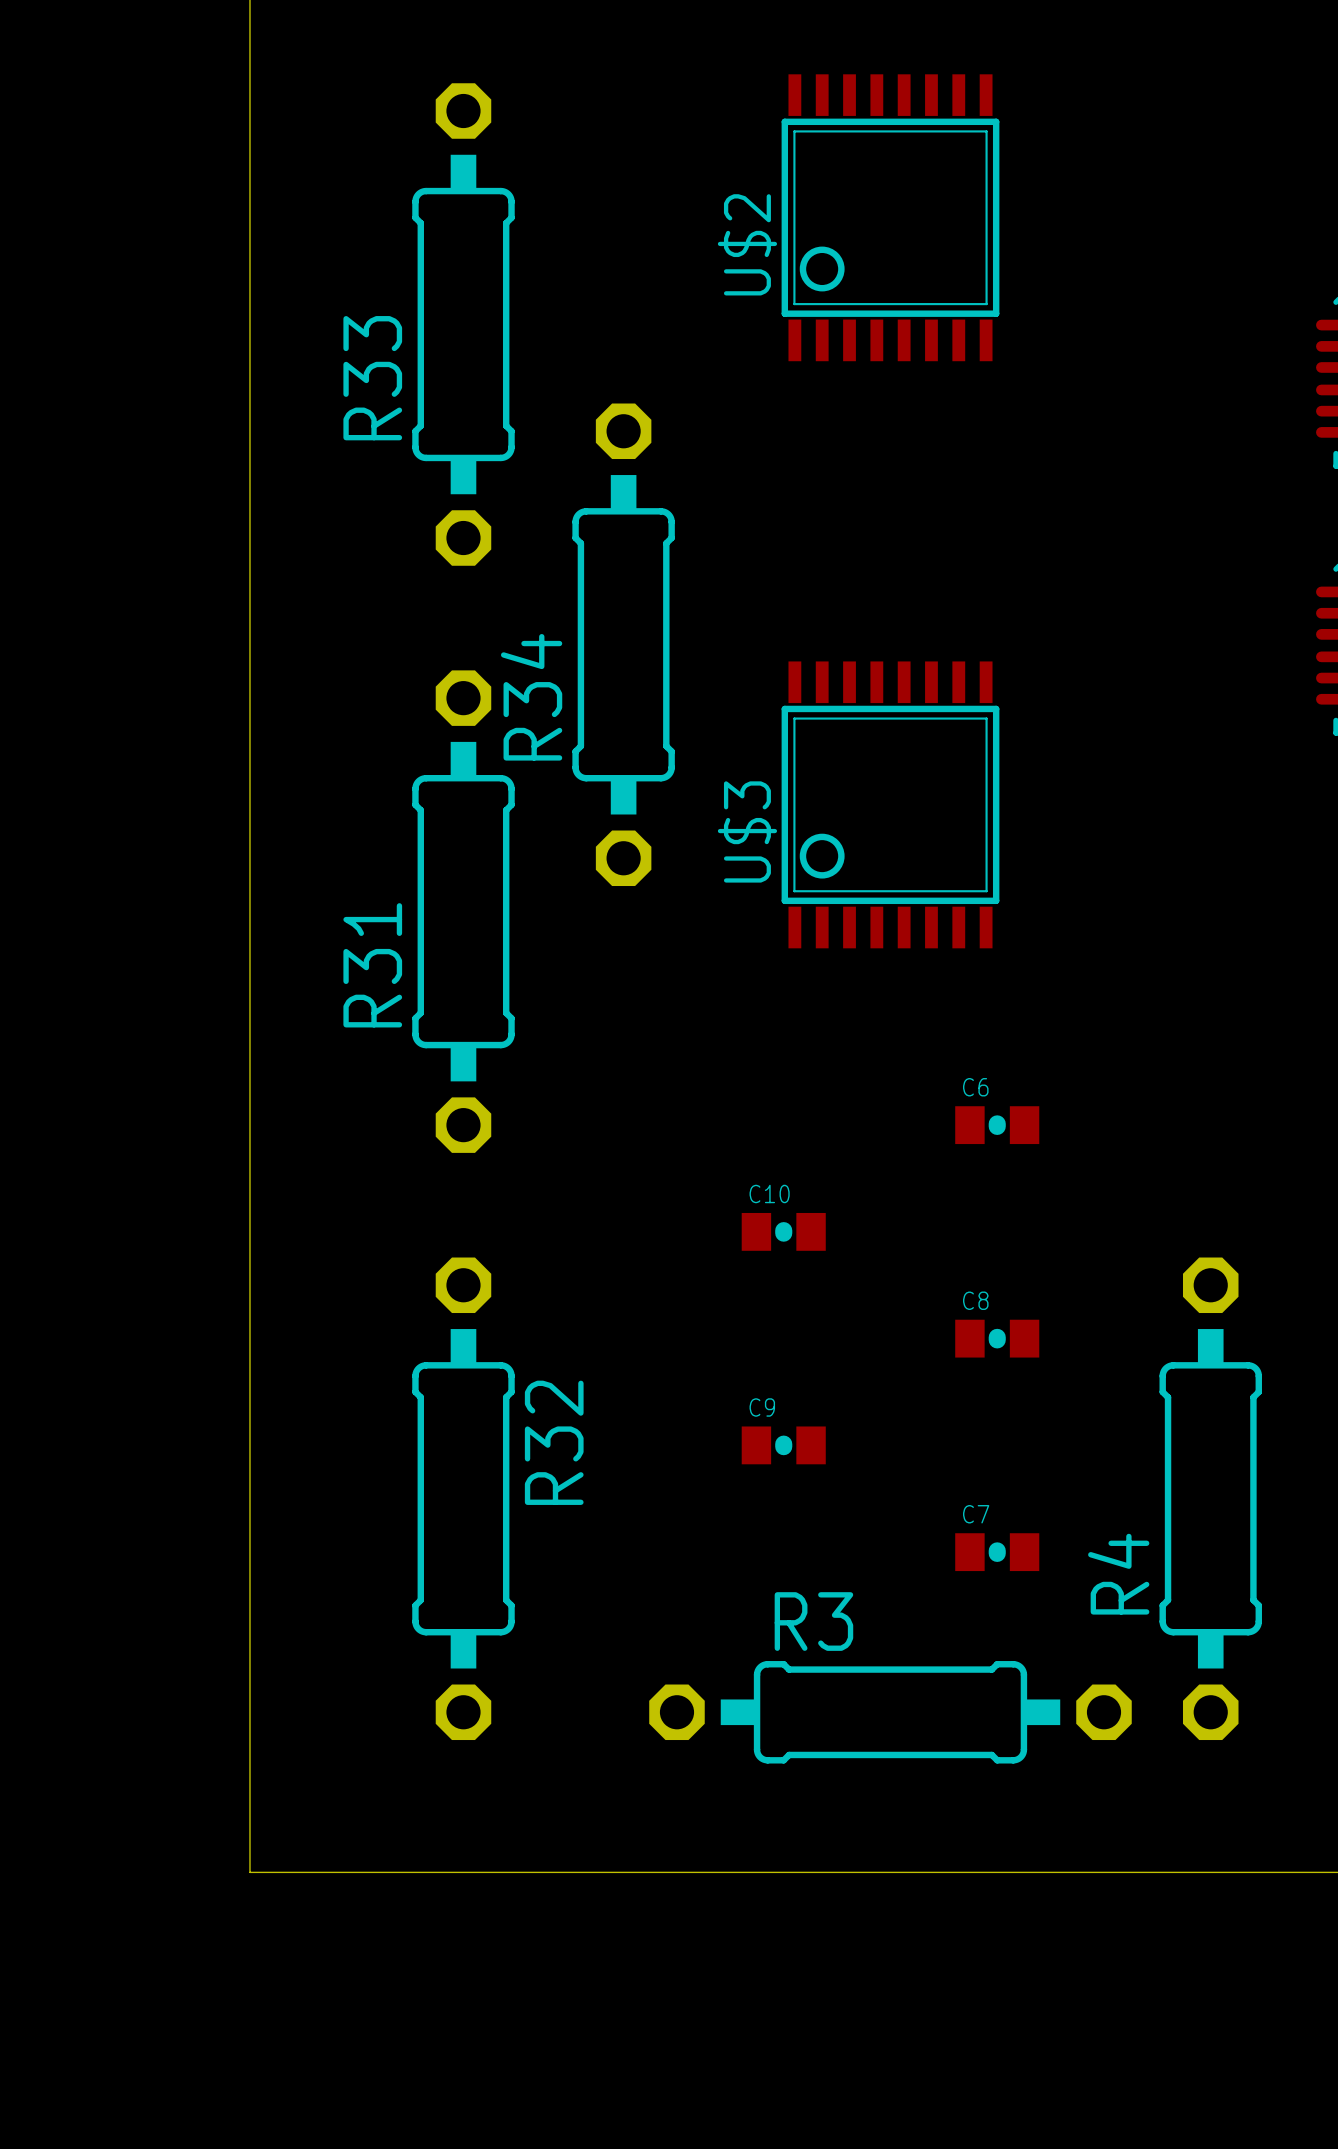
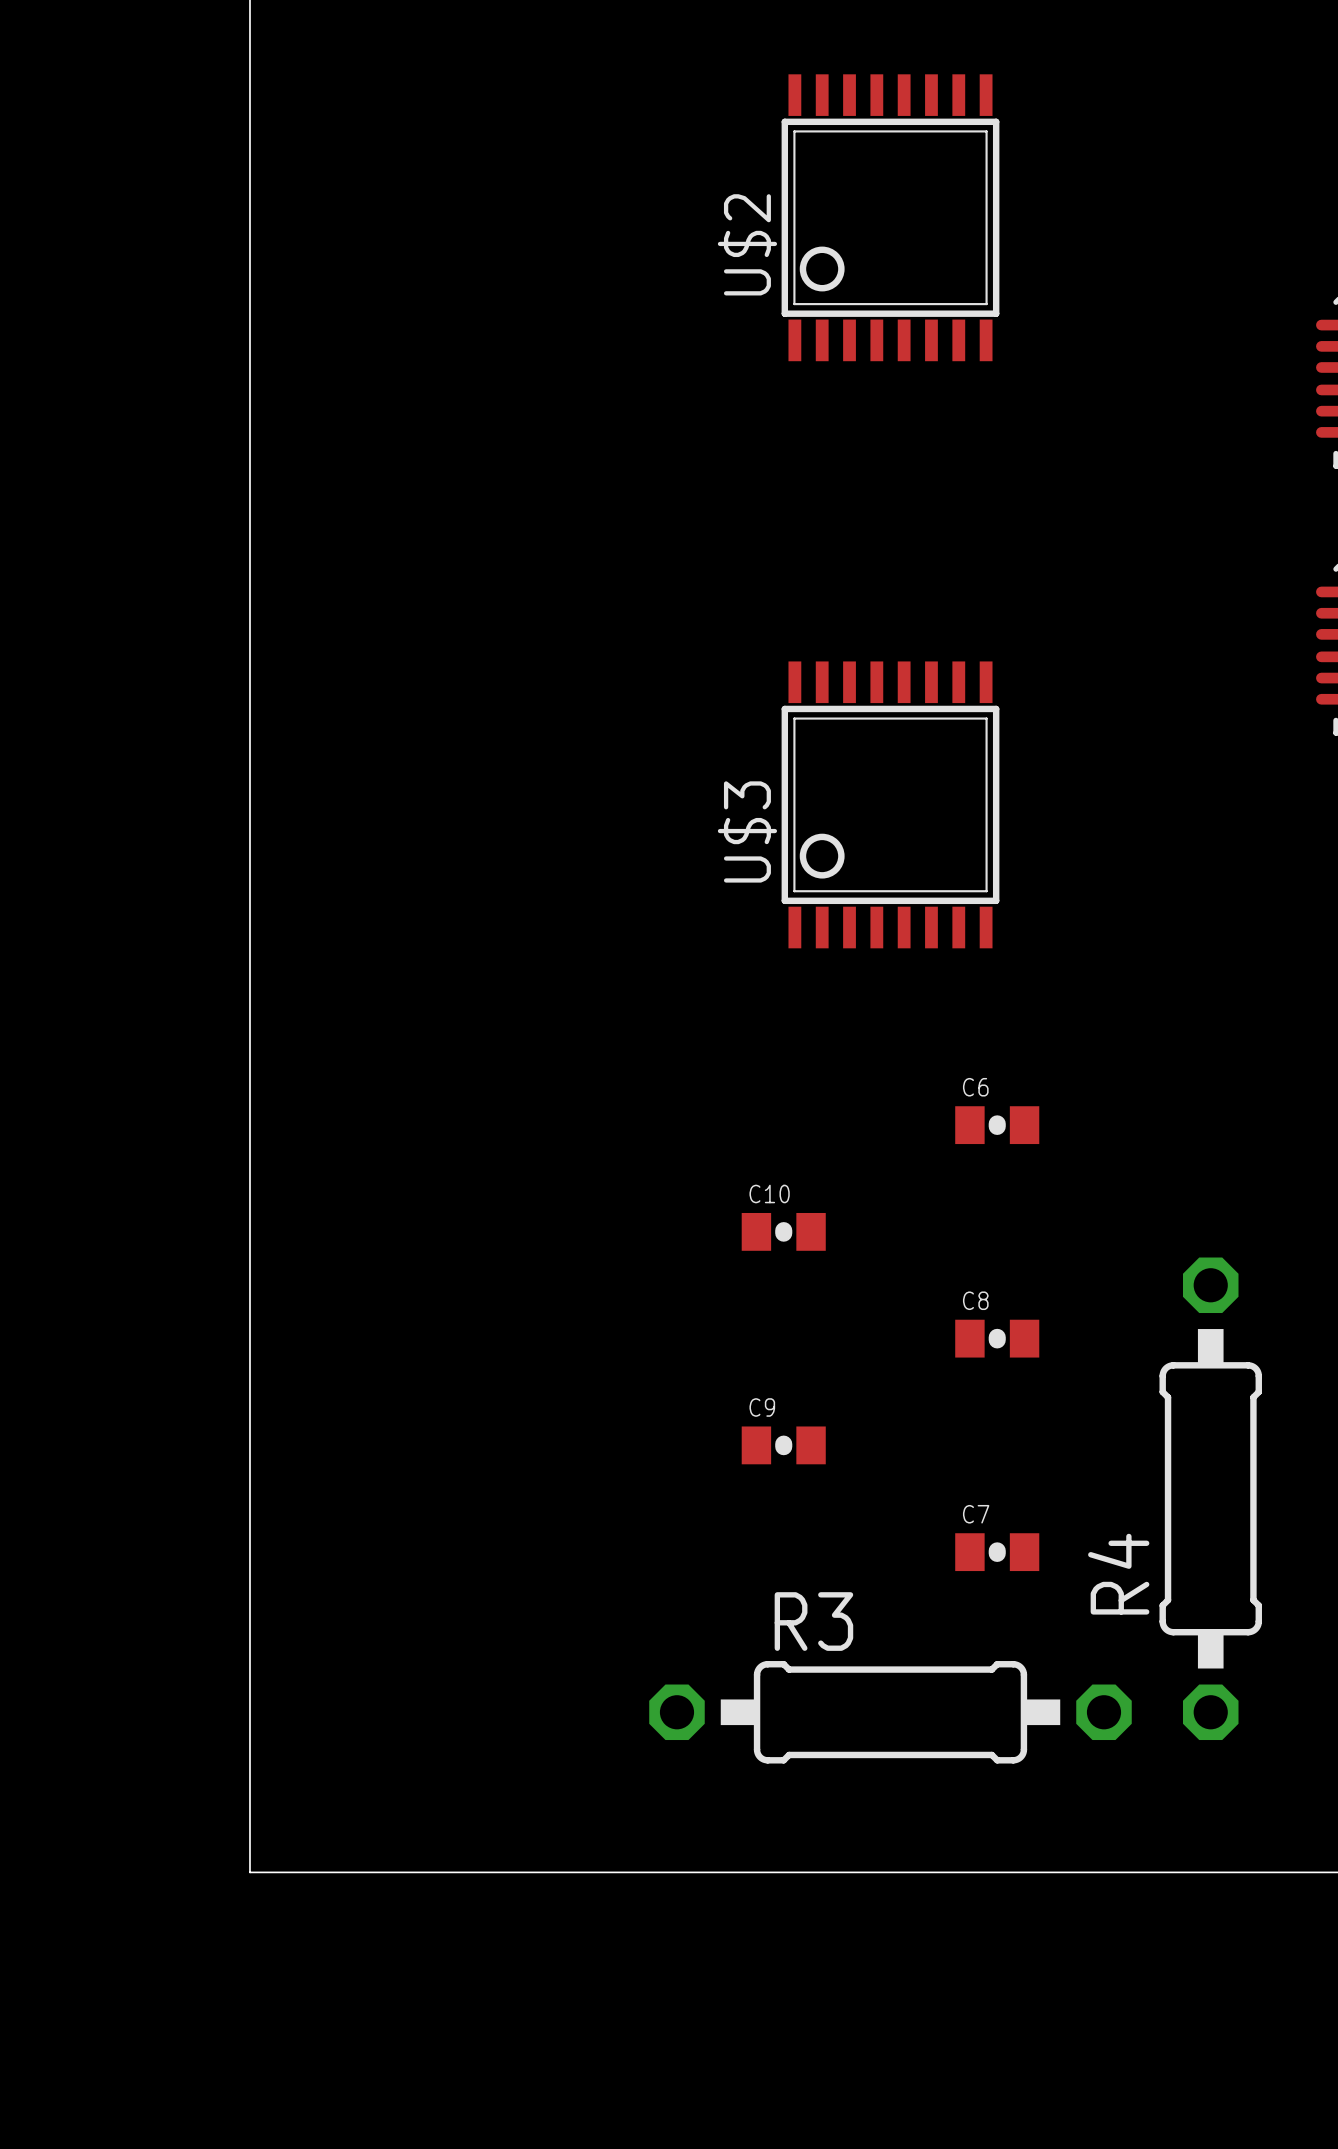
R33: (463, 324) -> none
R34: (623, 644) -> none
R31: (463, 911) -> none
R32: (463, 1498) -> none

